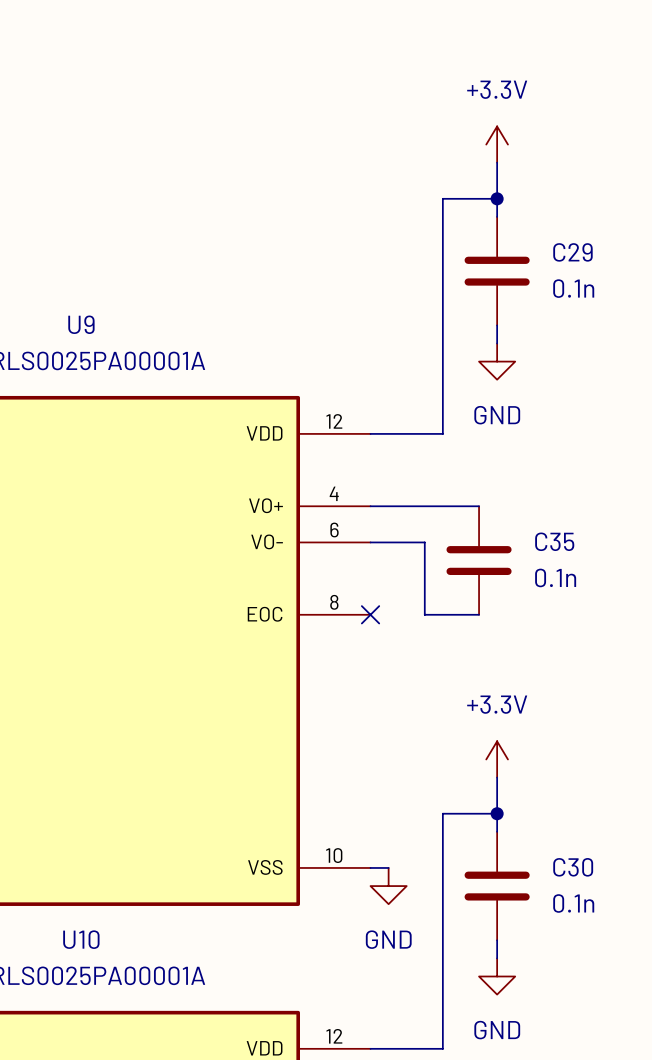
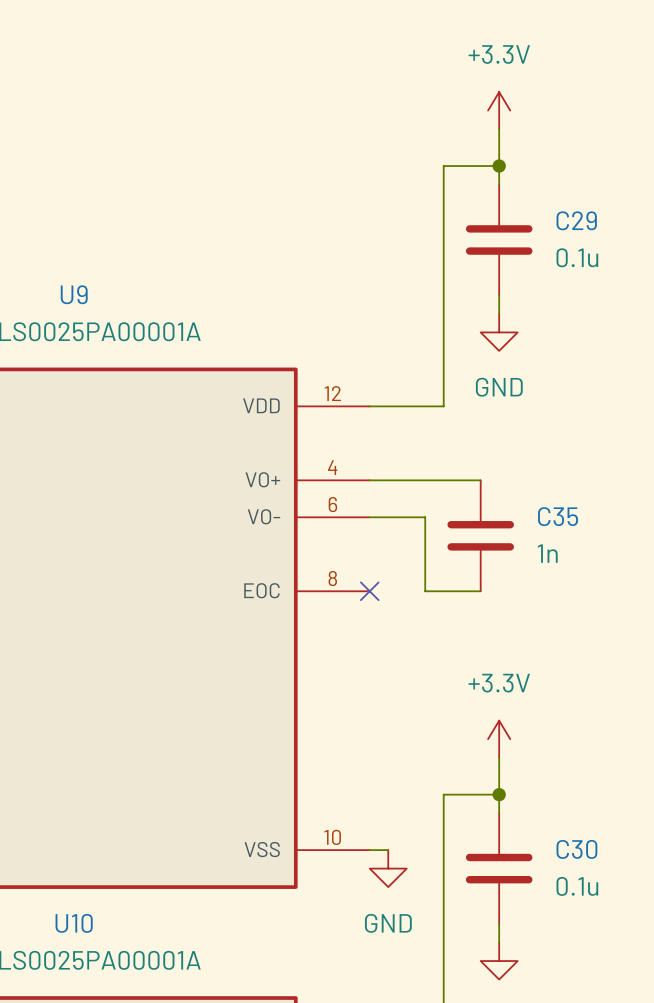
C29 value: 0.1n (573, 288) -> 0.1u (577, 257)
C35 value: 0.1n (555, 577) -> 1n (547, 553)
C30 value: 0.1n (573, 903) -> 0.1u (577, 886)

